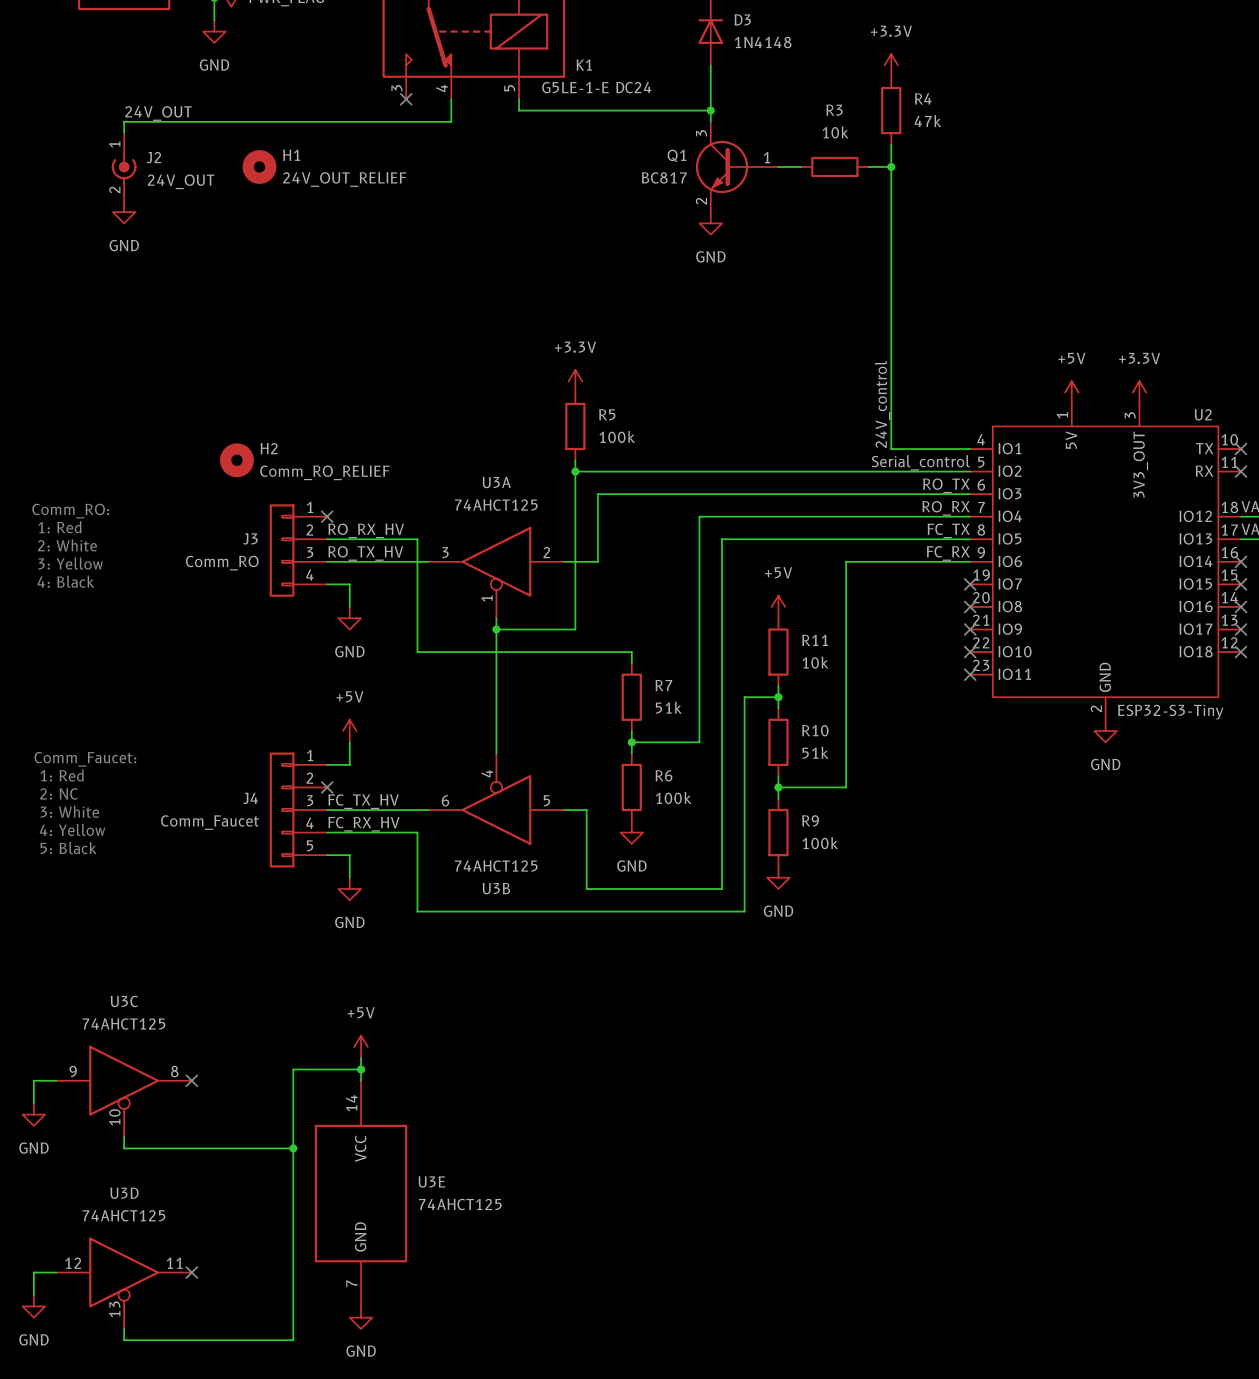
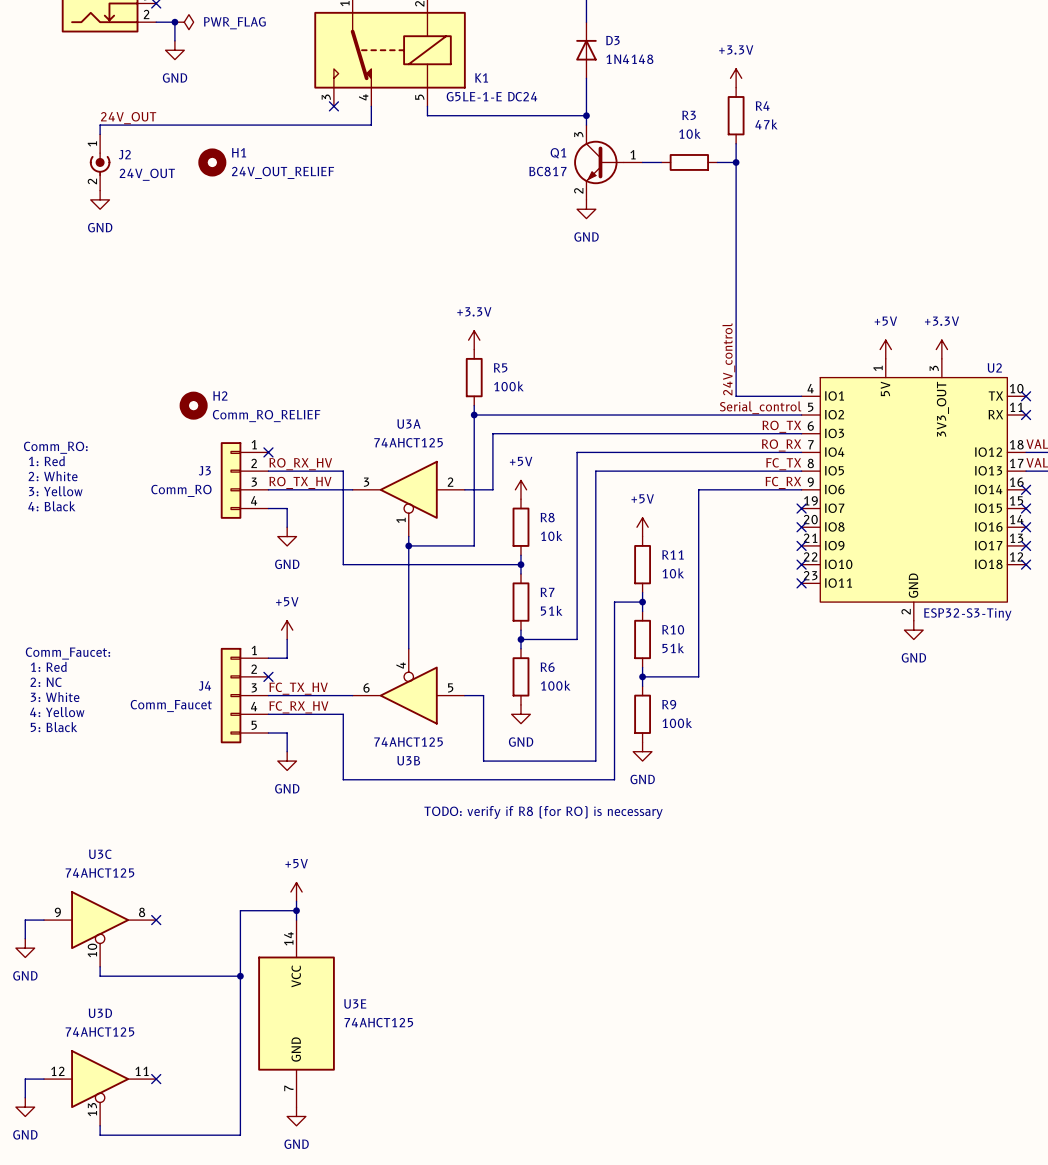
power symbol: none -> +5V (520, 489)
R8: none -> 10k (520, 527)
wire: none -> (520, 555) (520, 564)
junction: none -> (520, 564)
text: none -> TODO: verify if R8 (for RO) is necessary (543, 812)

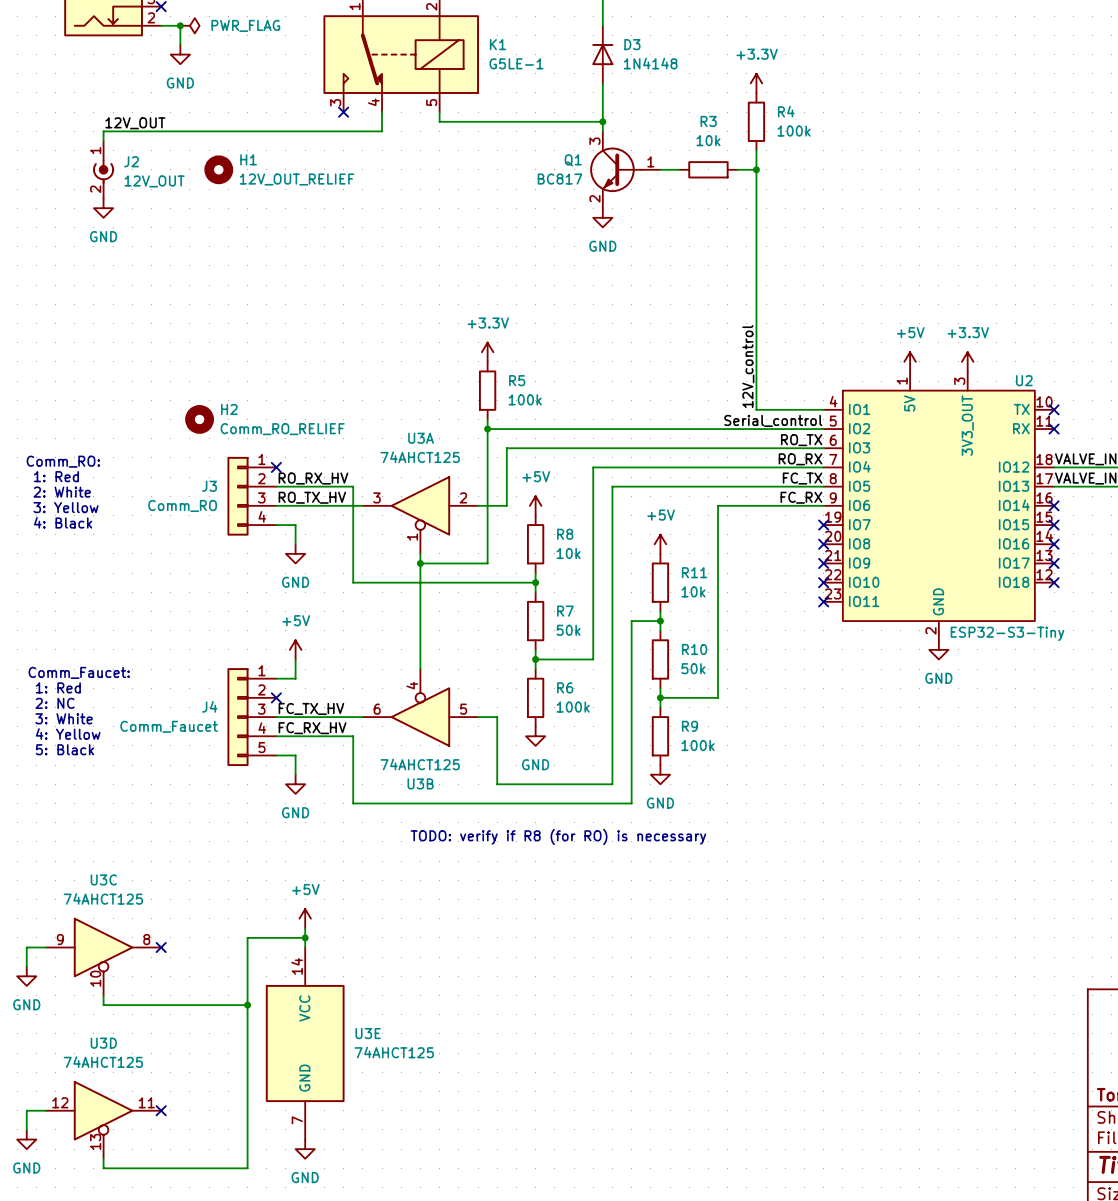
K1 name position: K1 (481, 77) -> K1 (497, 44)
K1 value: G5LE-1-E DC24 (491, 96) -> G5LE-1 (516, 63)
label: 24V_OUT (128, 118) -> 12V_OUT (135, 123)
R4 value: 47k (766, 124) -> 100k (794, 131)
H1 value: 24V_OUT_RELIEF (283, 172) -> 12V_OUT_RELIEF (297, 179)
J2 value: 24V_OUT (147, 174) -> 12V_OUT (154, 181)
label: 24V_control (728, 359) -> 12V_control (748, 366)
R7 value: 51k (551, 610) -> 50k (568, 630)
R10 value: 51k (673, 648) -> 50k (693, 668)

